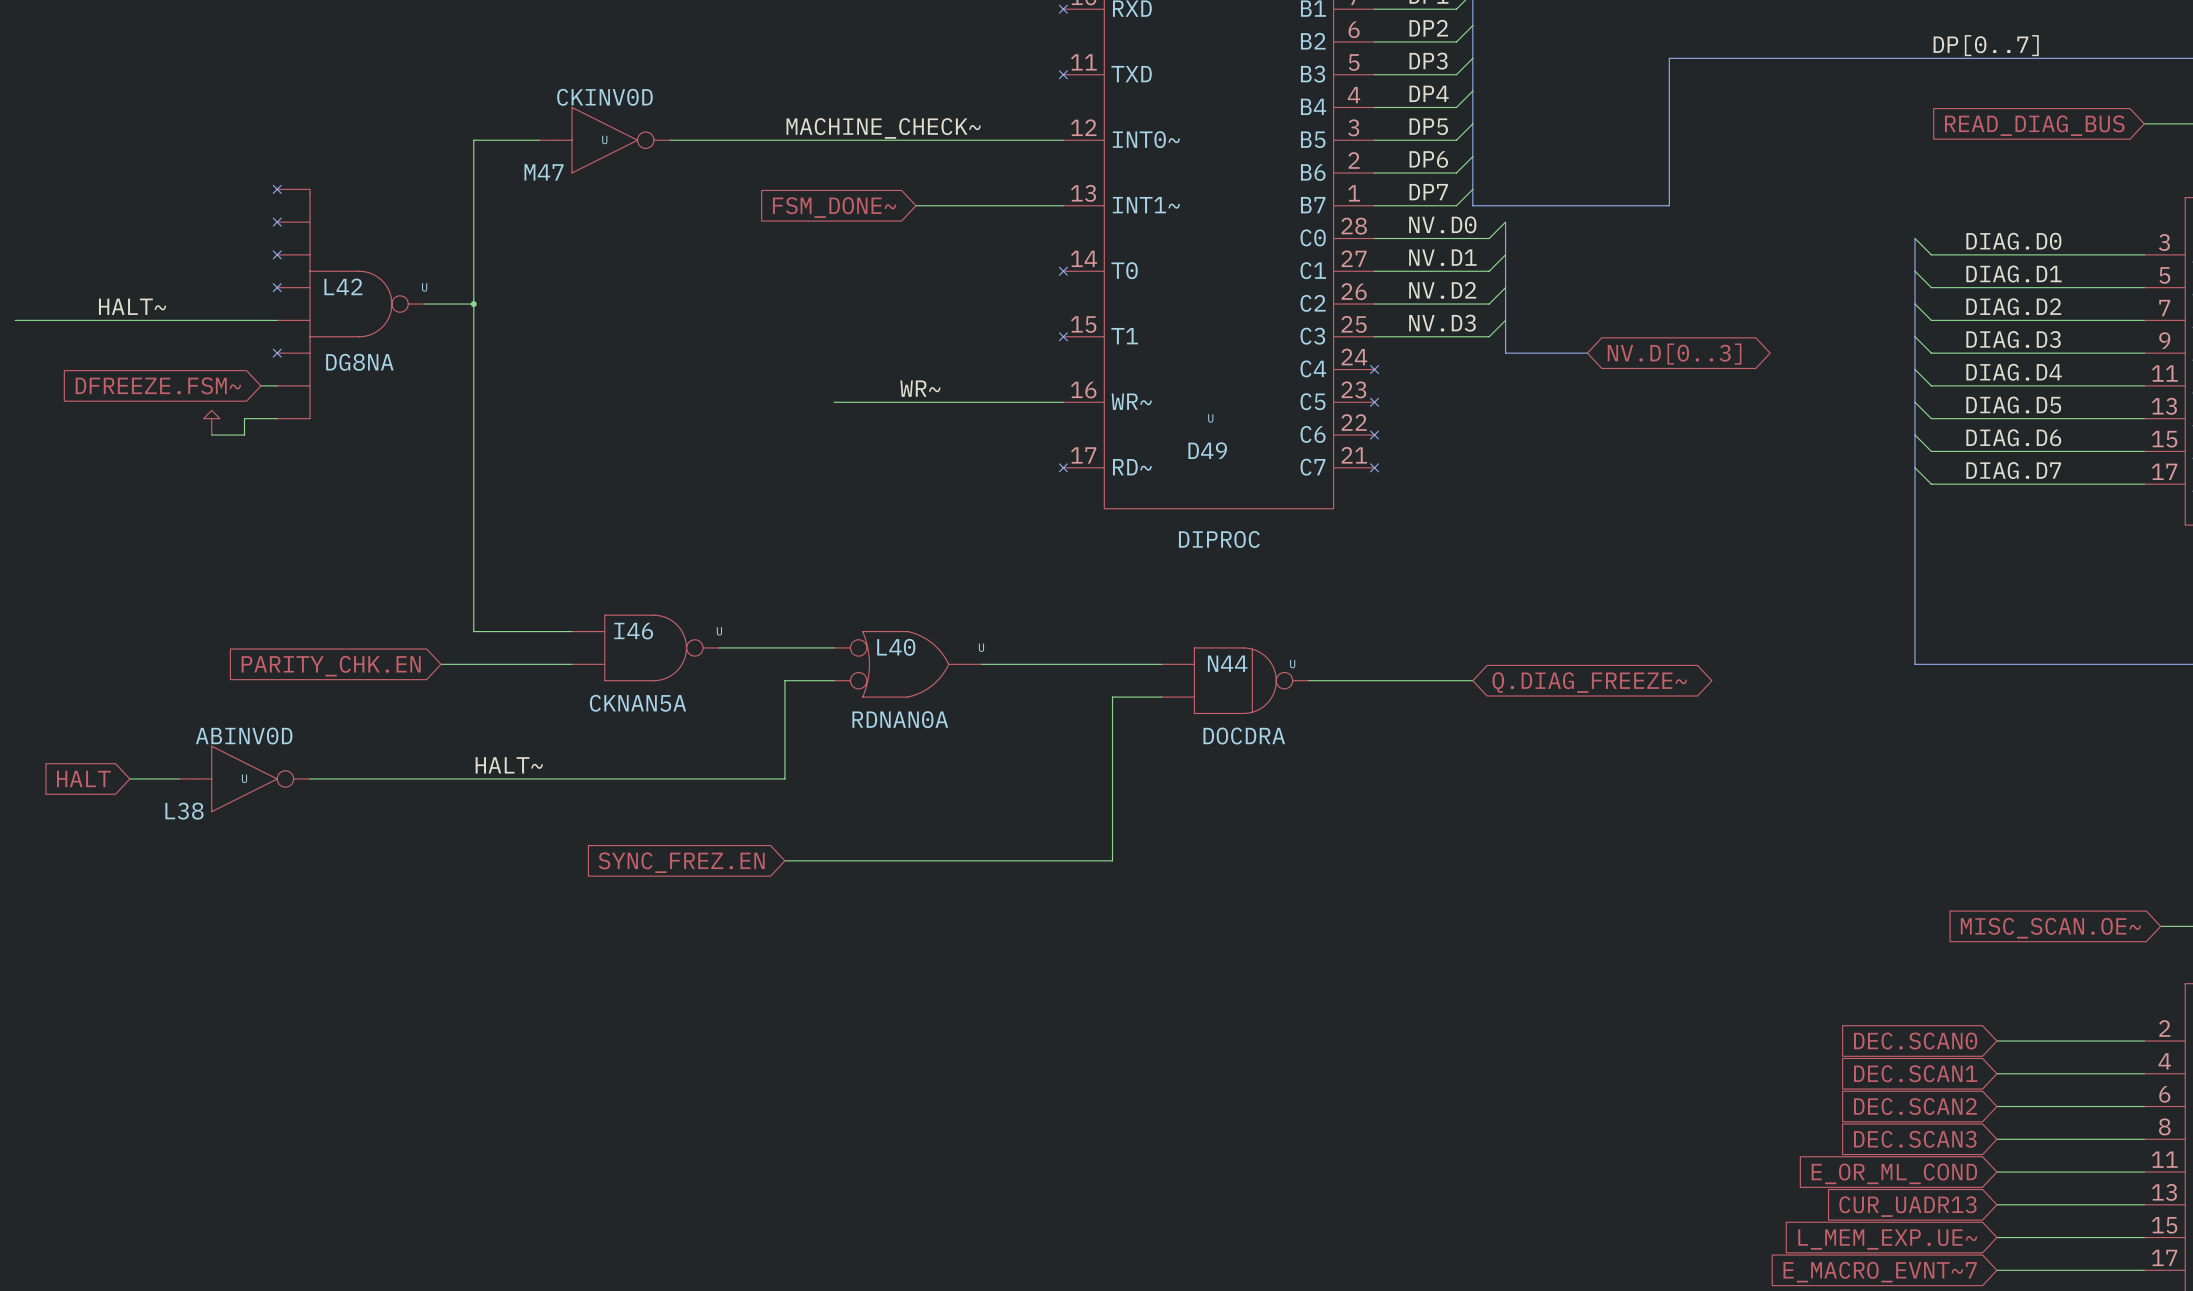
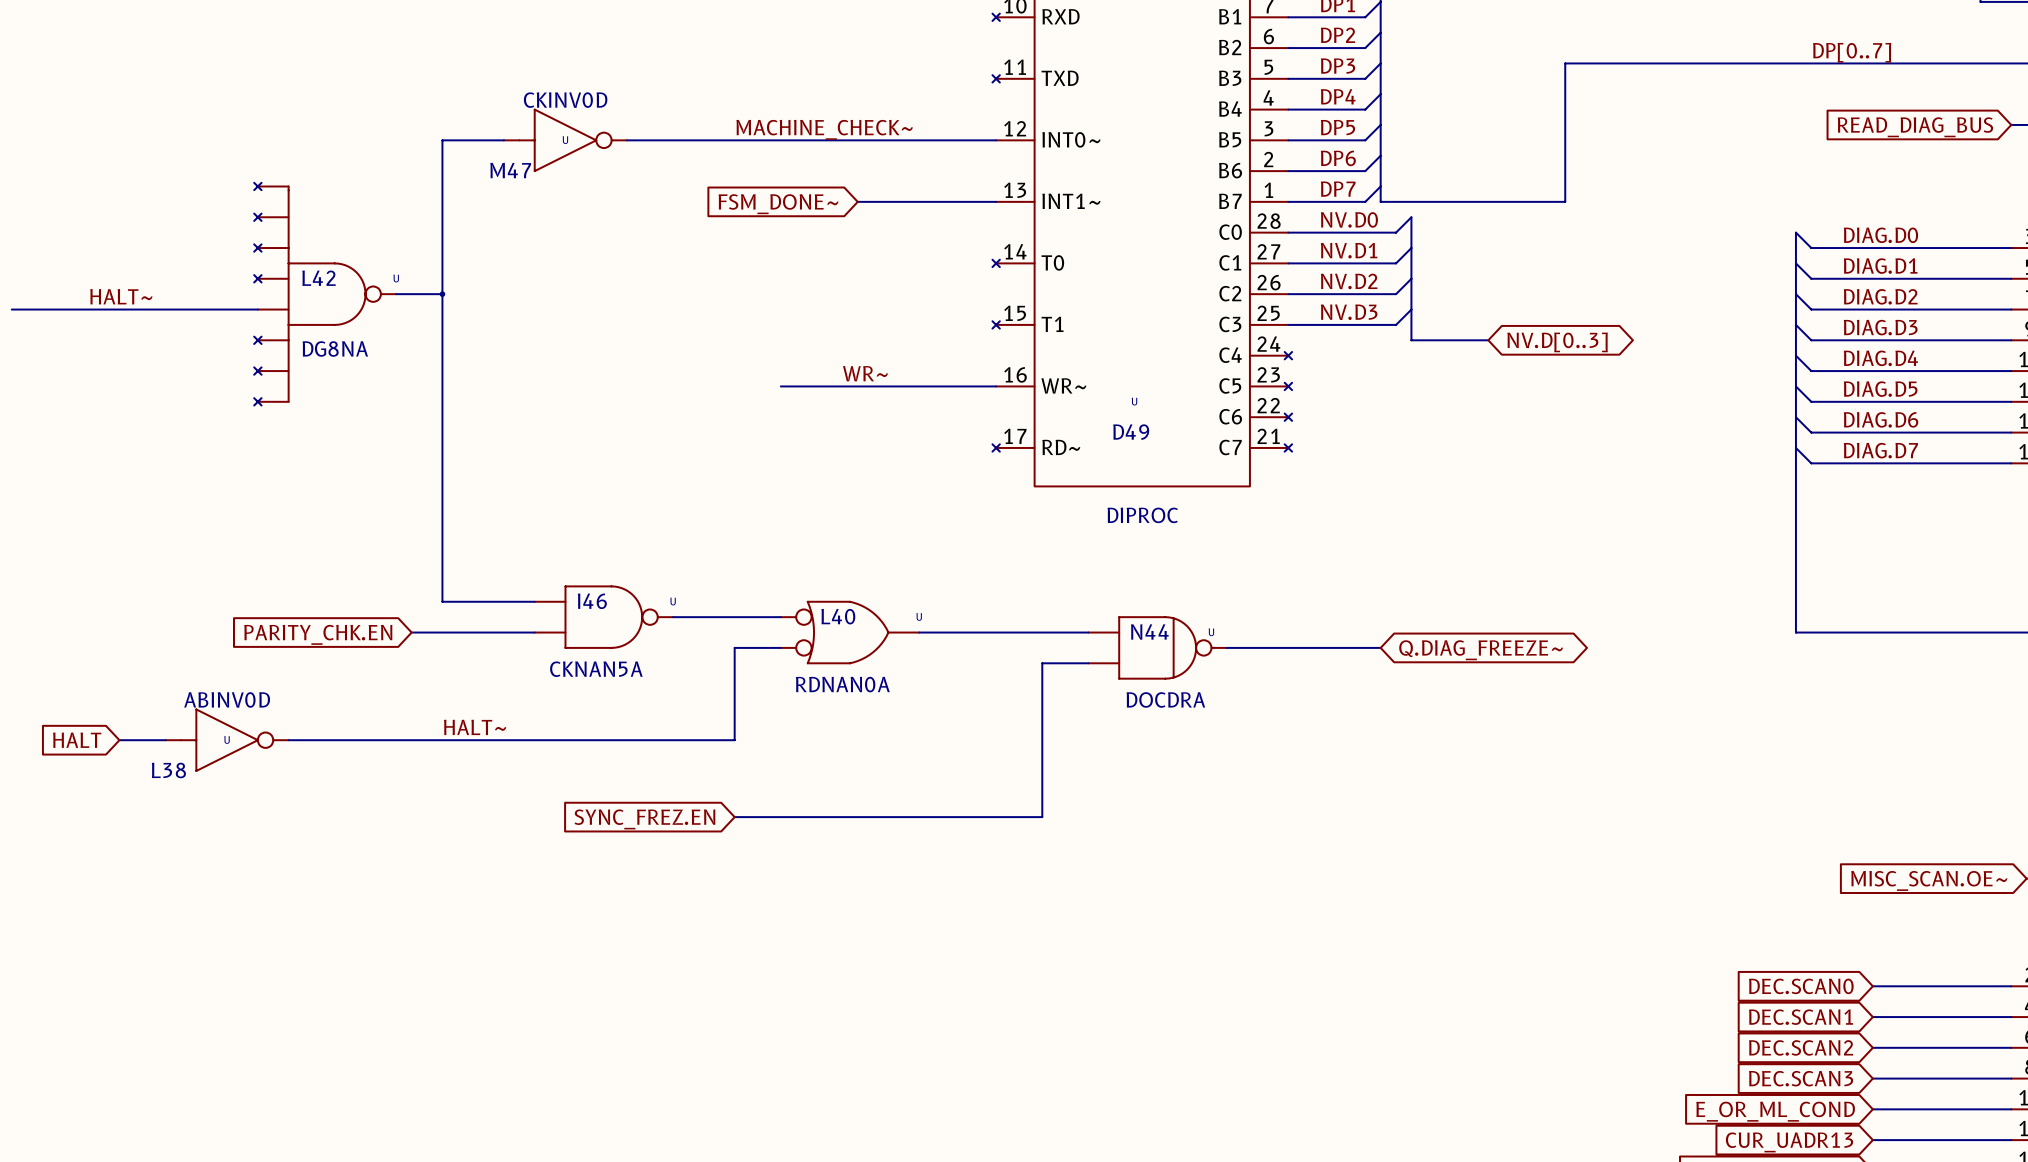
global label: DFREEZE.FSM~ (158, 385) -> none
wire: (260, 385) (277, 385) -> none
no-connect mark: none -> (257, 371)
wire: (277, 418) (244, 418) (244, 435) (211, 435) -> none
no-connect mark: none -> (257, 401)
power symbol: (211, 422) -> none

